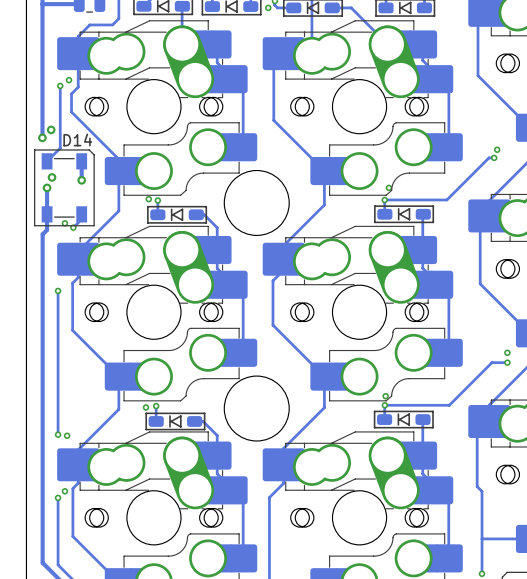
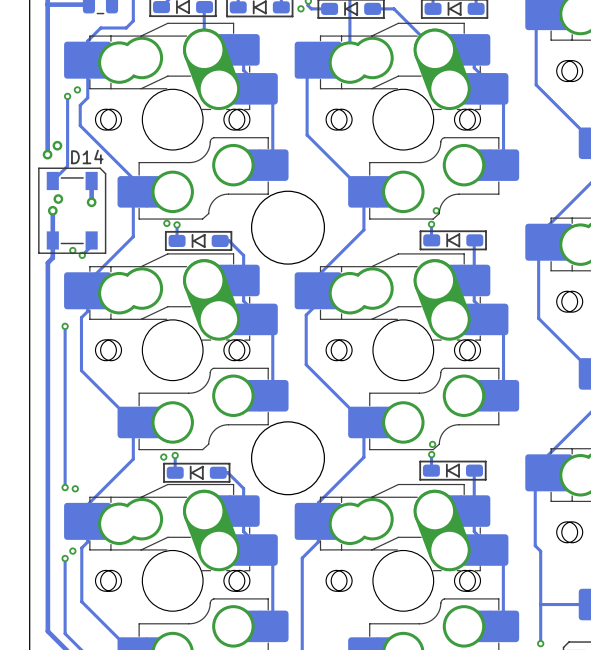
via: (497, 149) -> none
track: (494, 157) (488, 157) (446, 199) (384, 200) -> none
via: (494, 157) -> none
via: (507, 352) -> none
track: (507, 362) (491, 362) (449, 405) (384, 405) -> none
via: (507, 362) -> none

